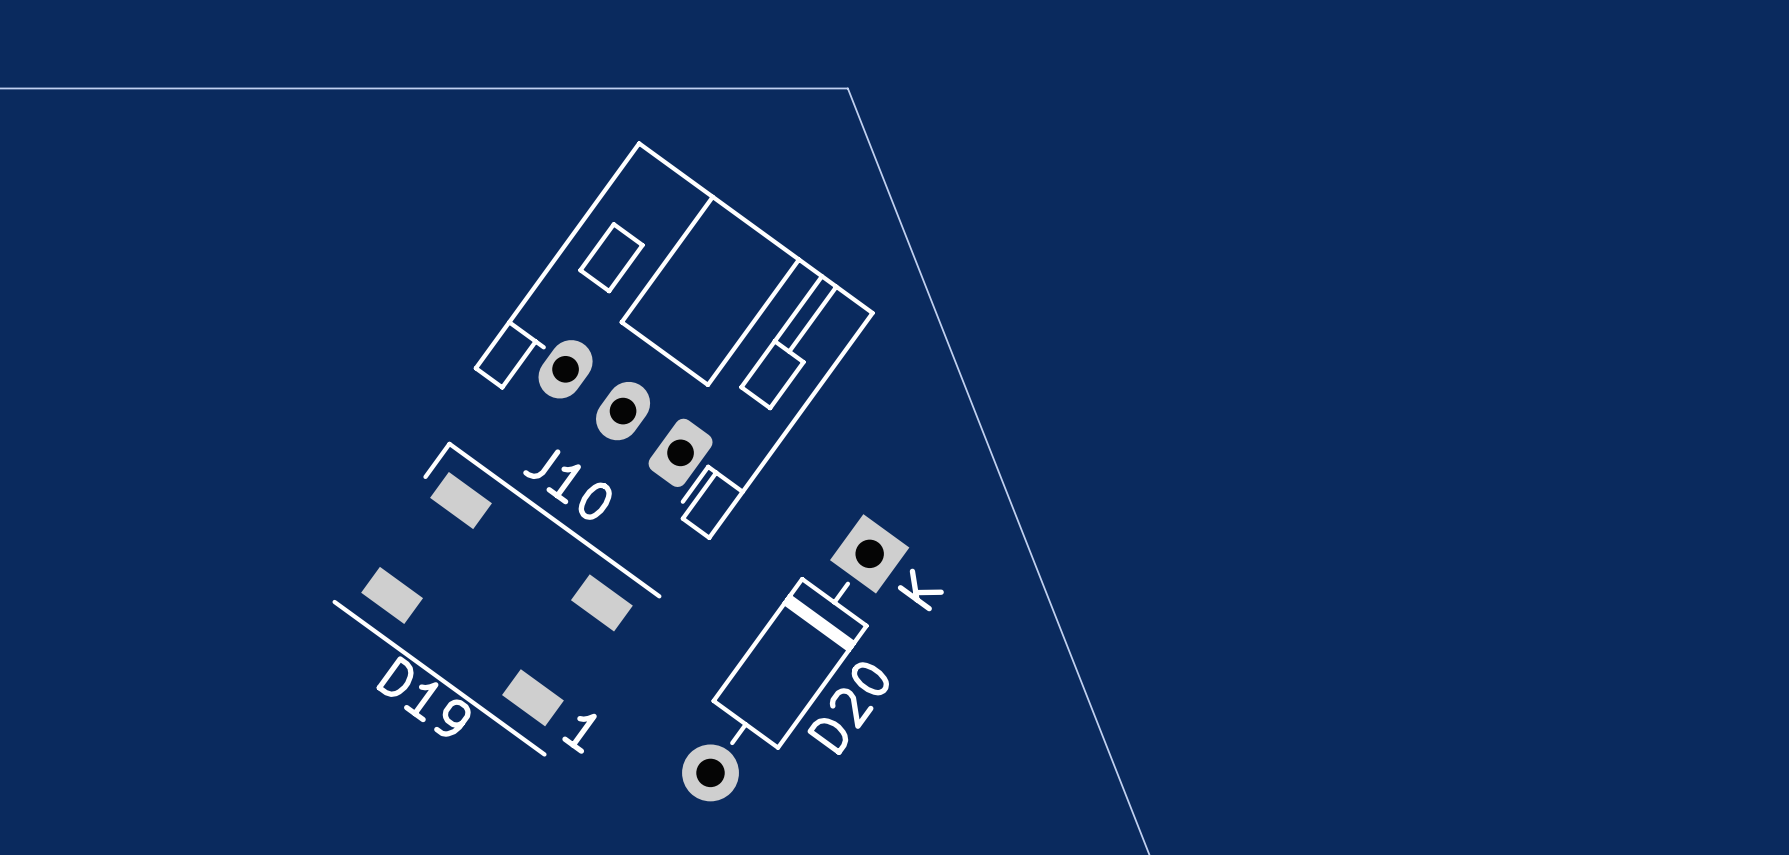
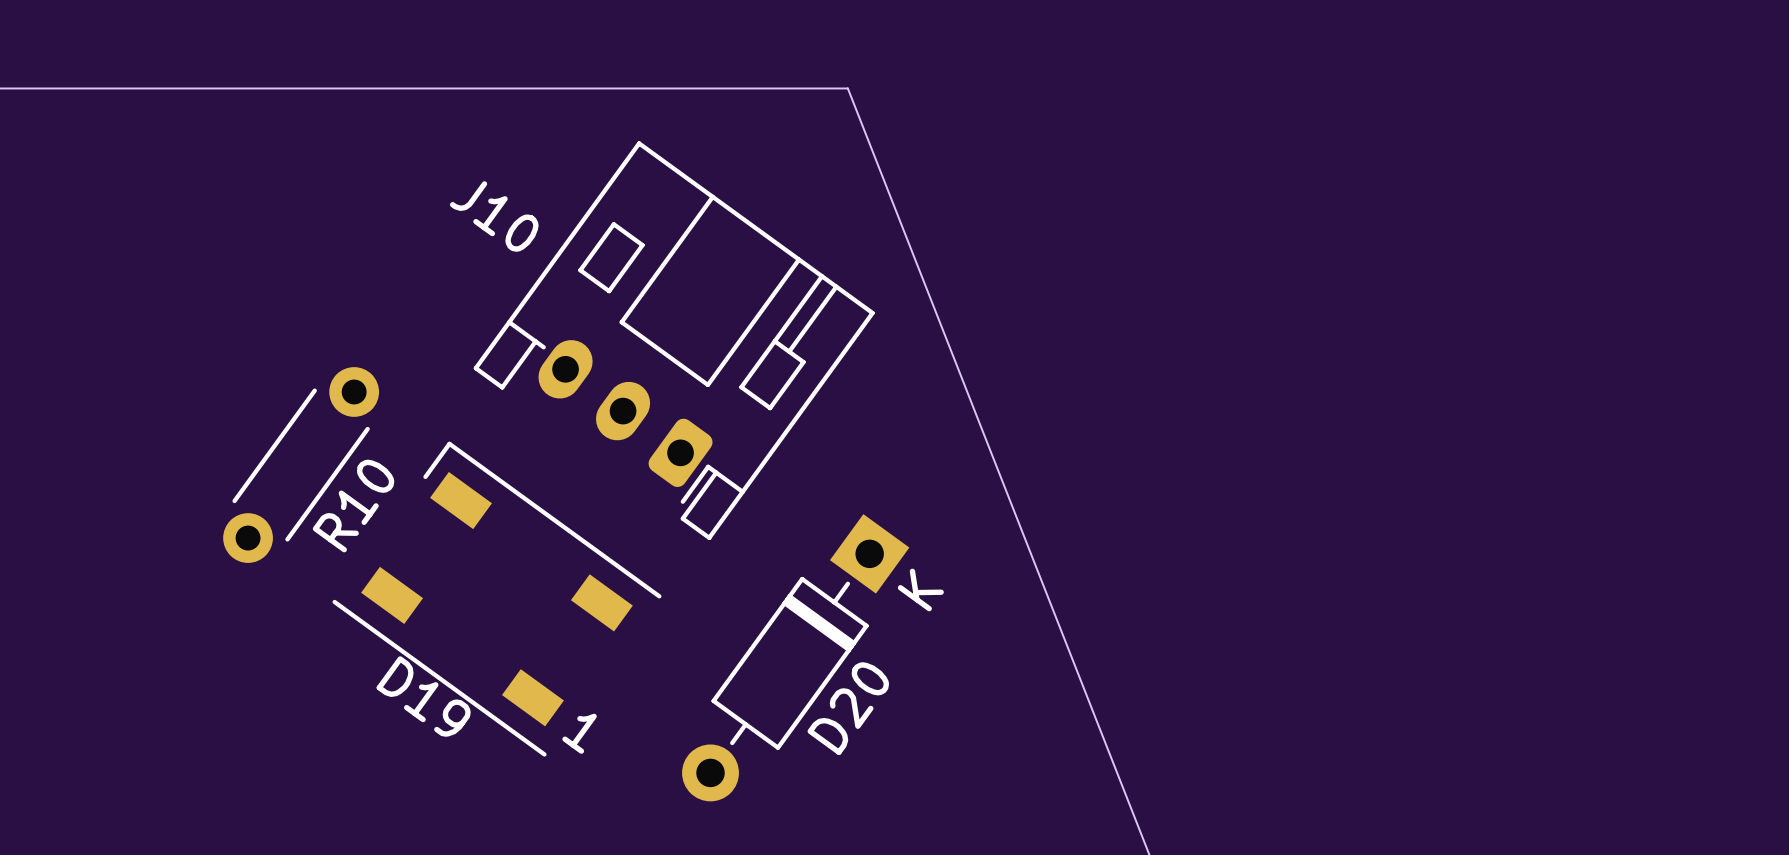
R10: none -> (301, 465)
J10 name position: J10 (567, 484) -> J10 (494, 216)

